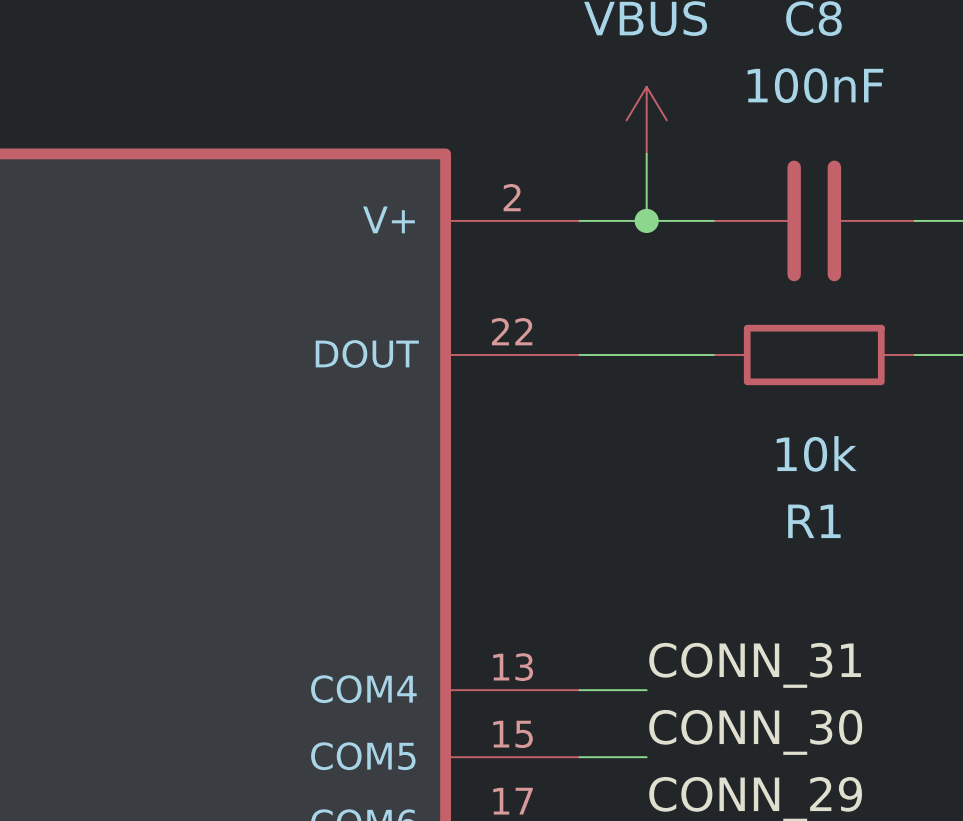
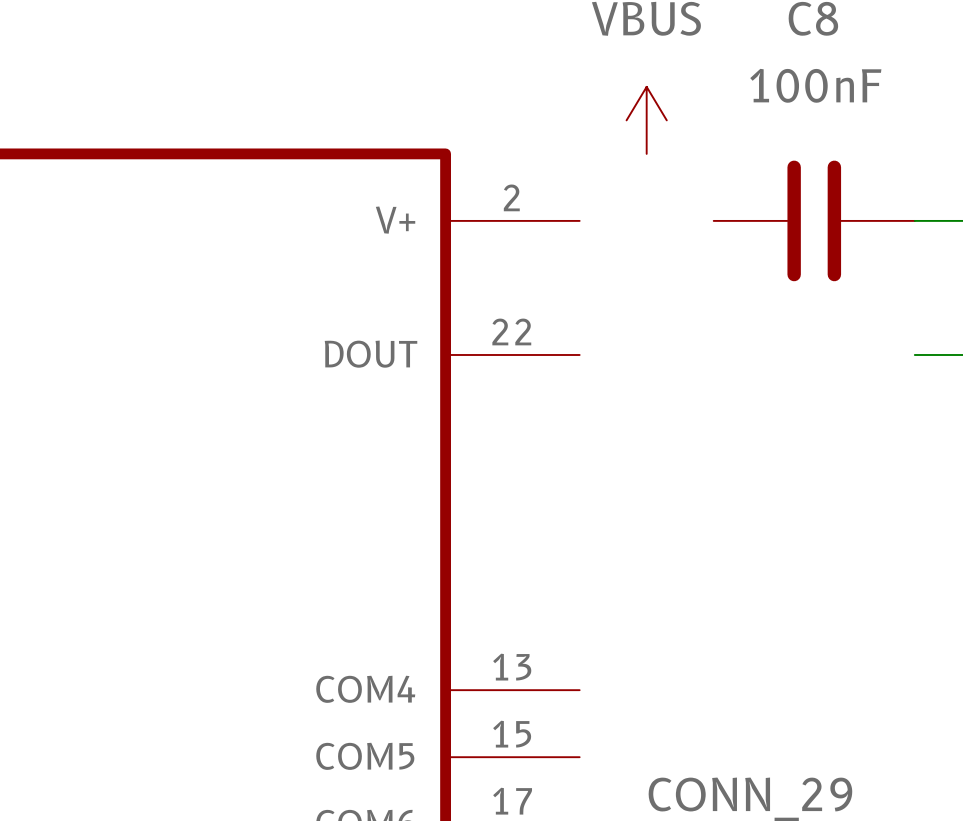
wire: (646, 153) (646, 220) -> none
wire: (579, 220) (713, 220) -> none
junction: (646, 220) -> none
wire: (579, 354) (713, 354) -> none
R1: 10k (814, 354) -> none
label: CONN_31 (755, 665) -> none
wire: (579, 690) (646, 690) -> none
label: CONN_30 (755, 732) -> none
wire: (579, 757) (646, 757) -> none

